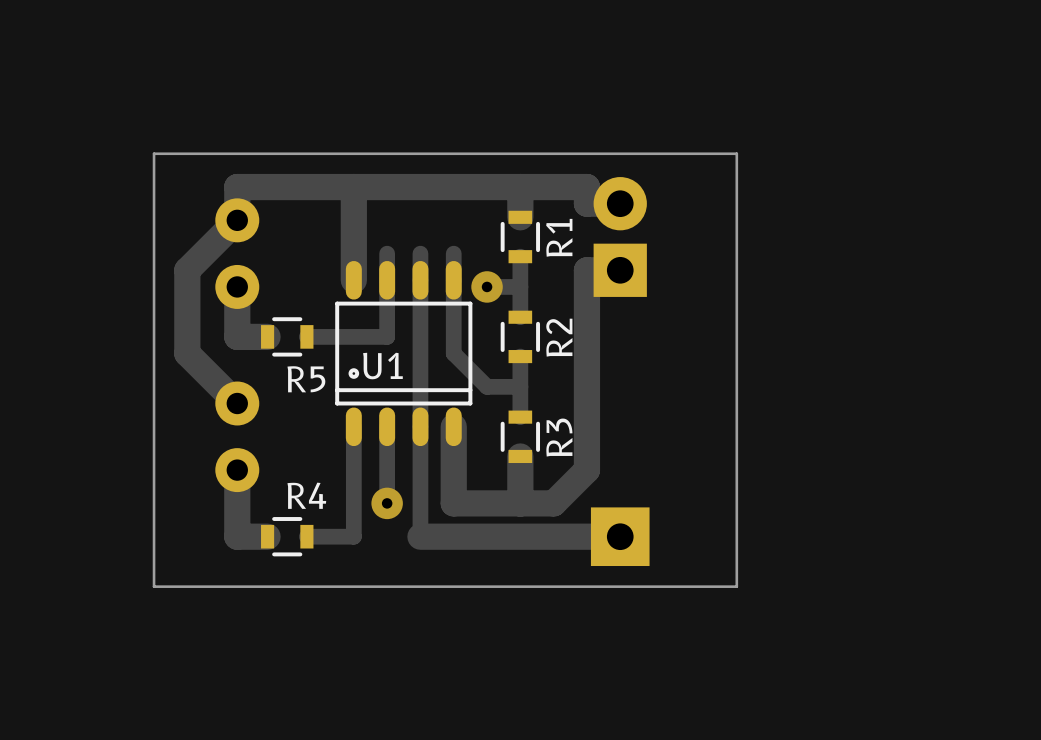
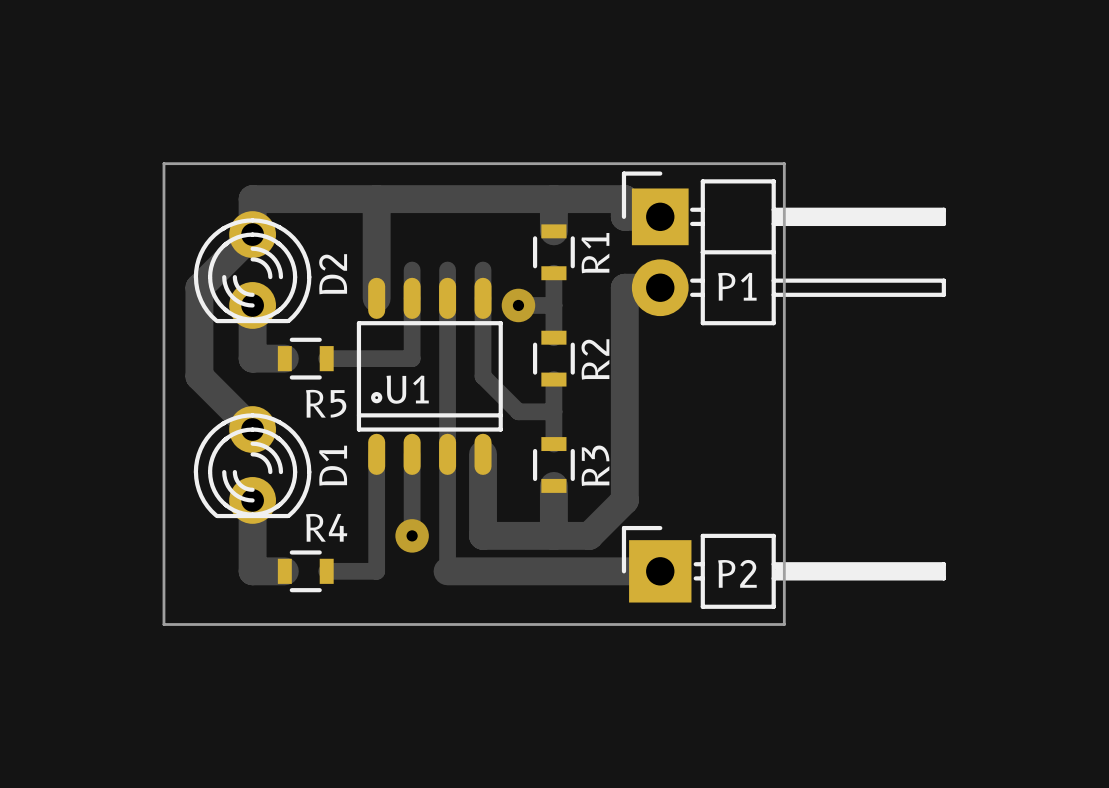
P1 side: bottom (620, 236) -> top (783, 248)
D2 side: bottom (237, 253) -> top (252, 270)
D1 side: bottom (237, 436) -> top (252, 464)
P2 side: bottom (620, 536) -> top (783, 567)

